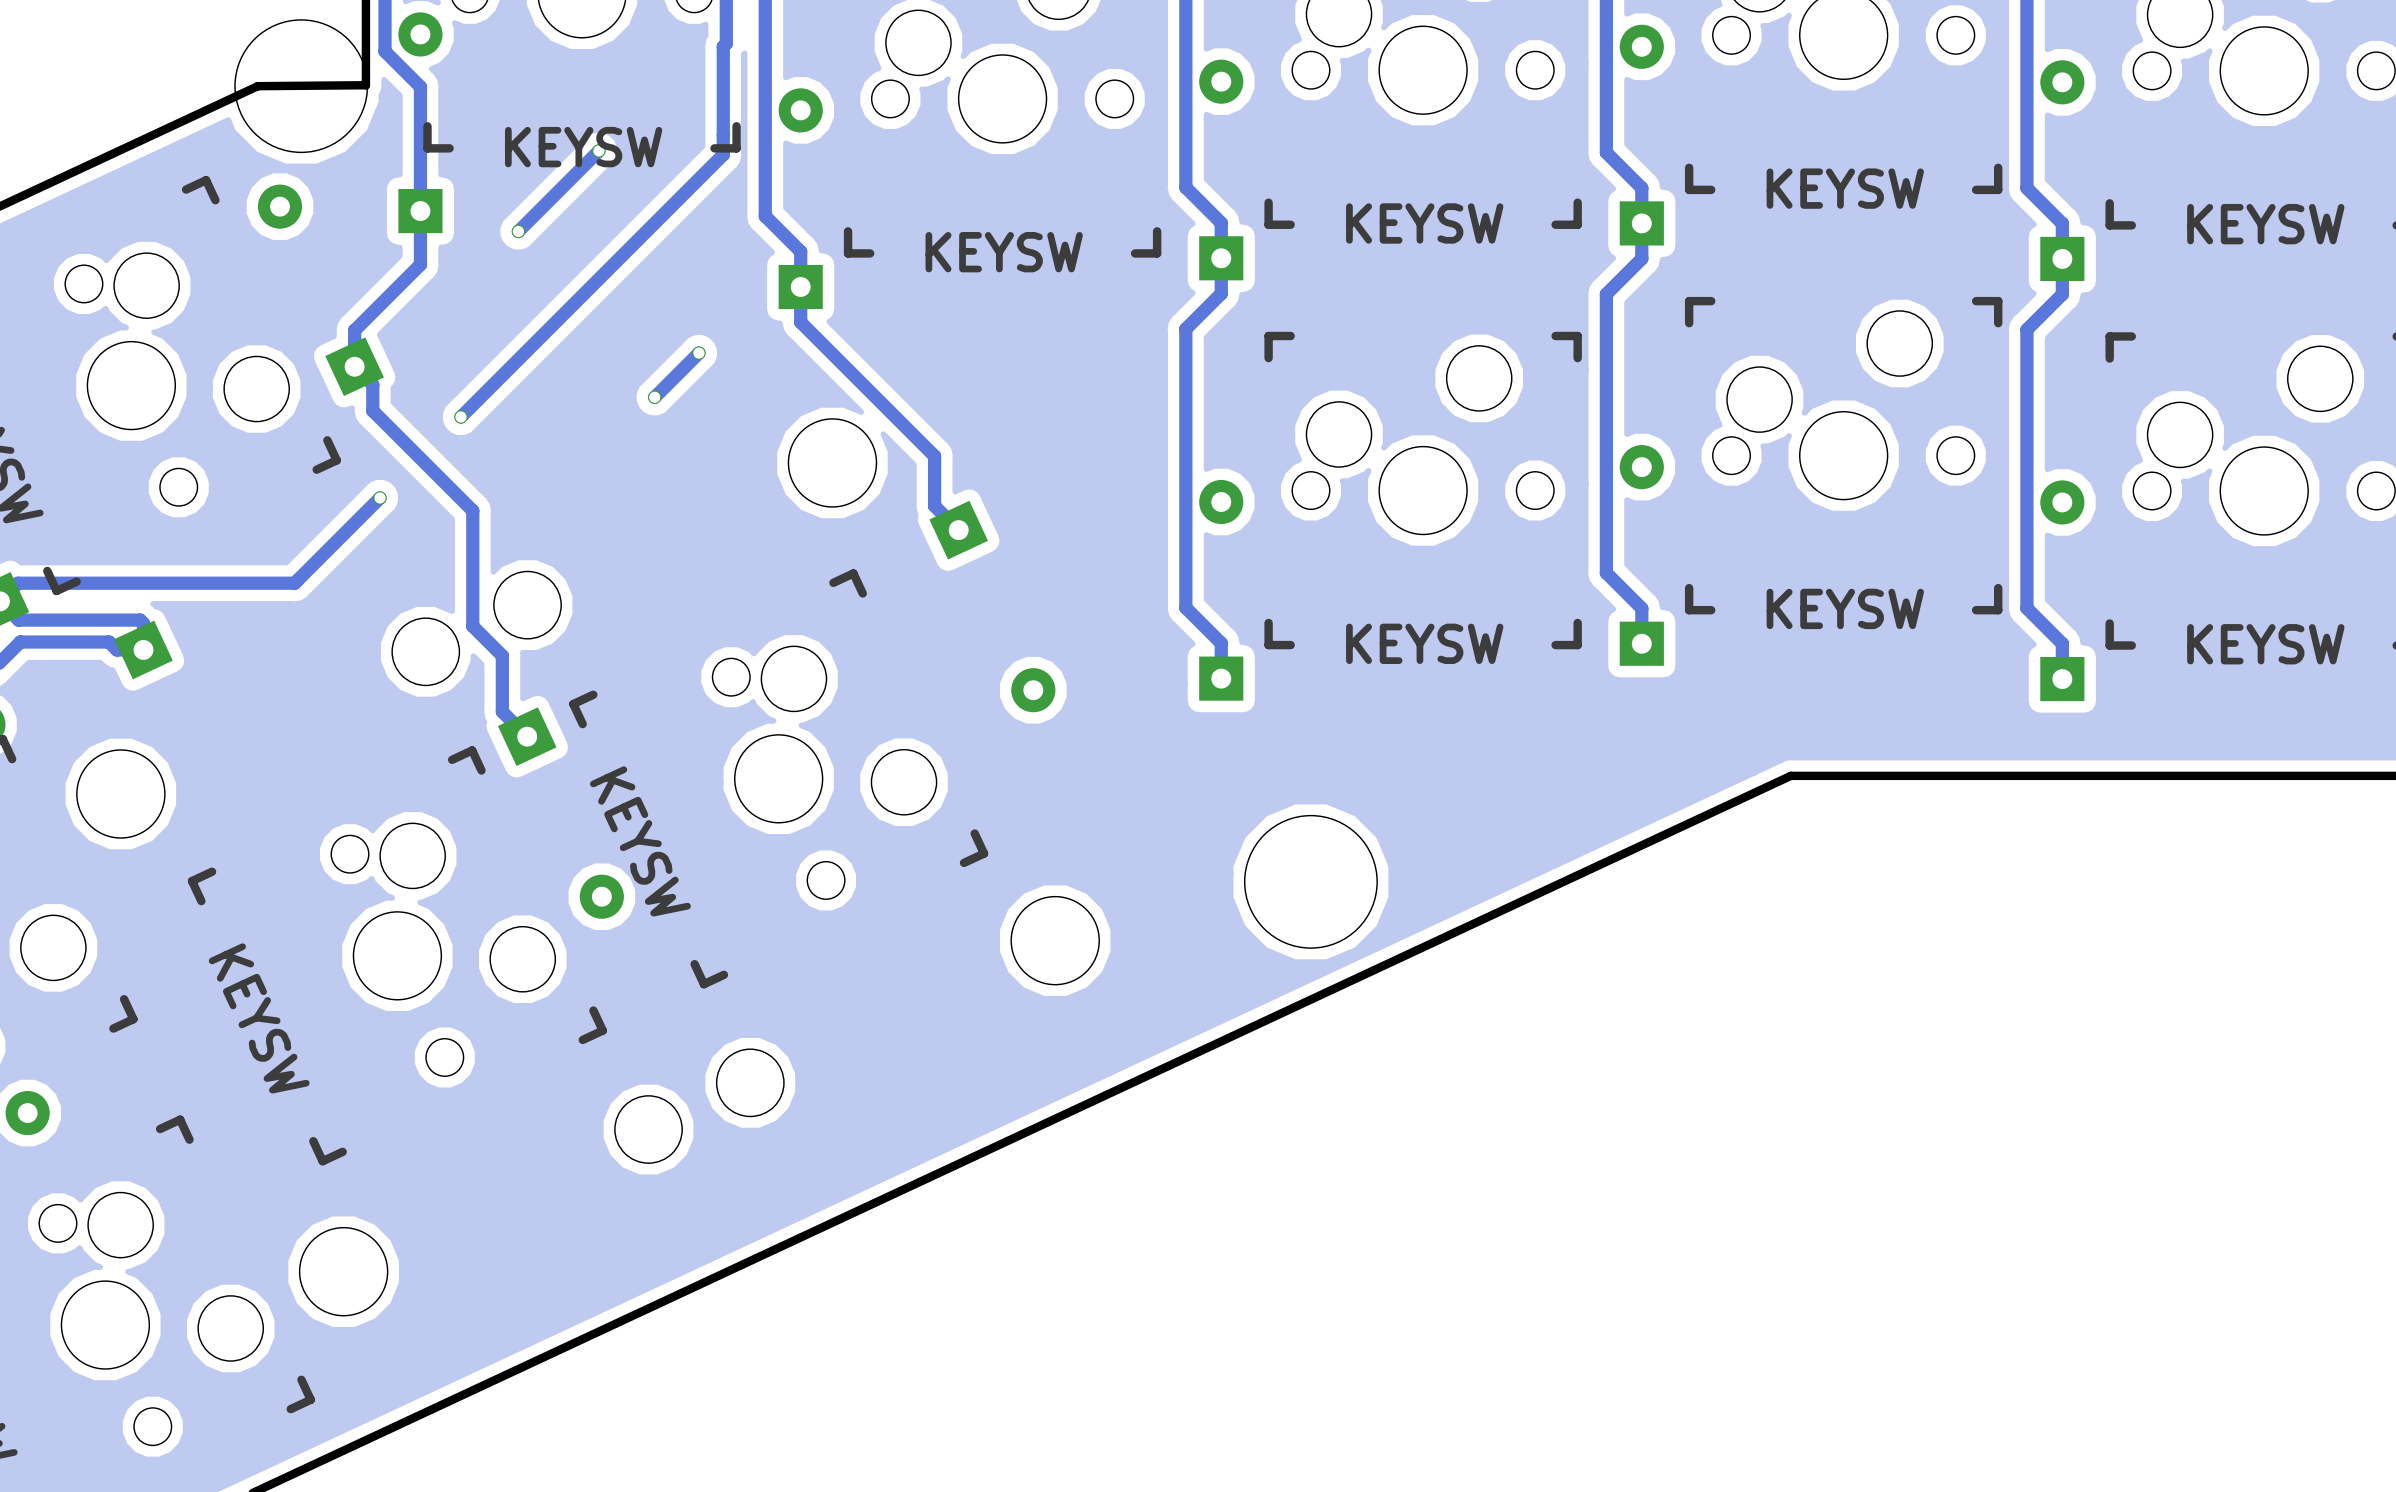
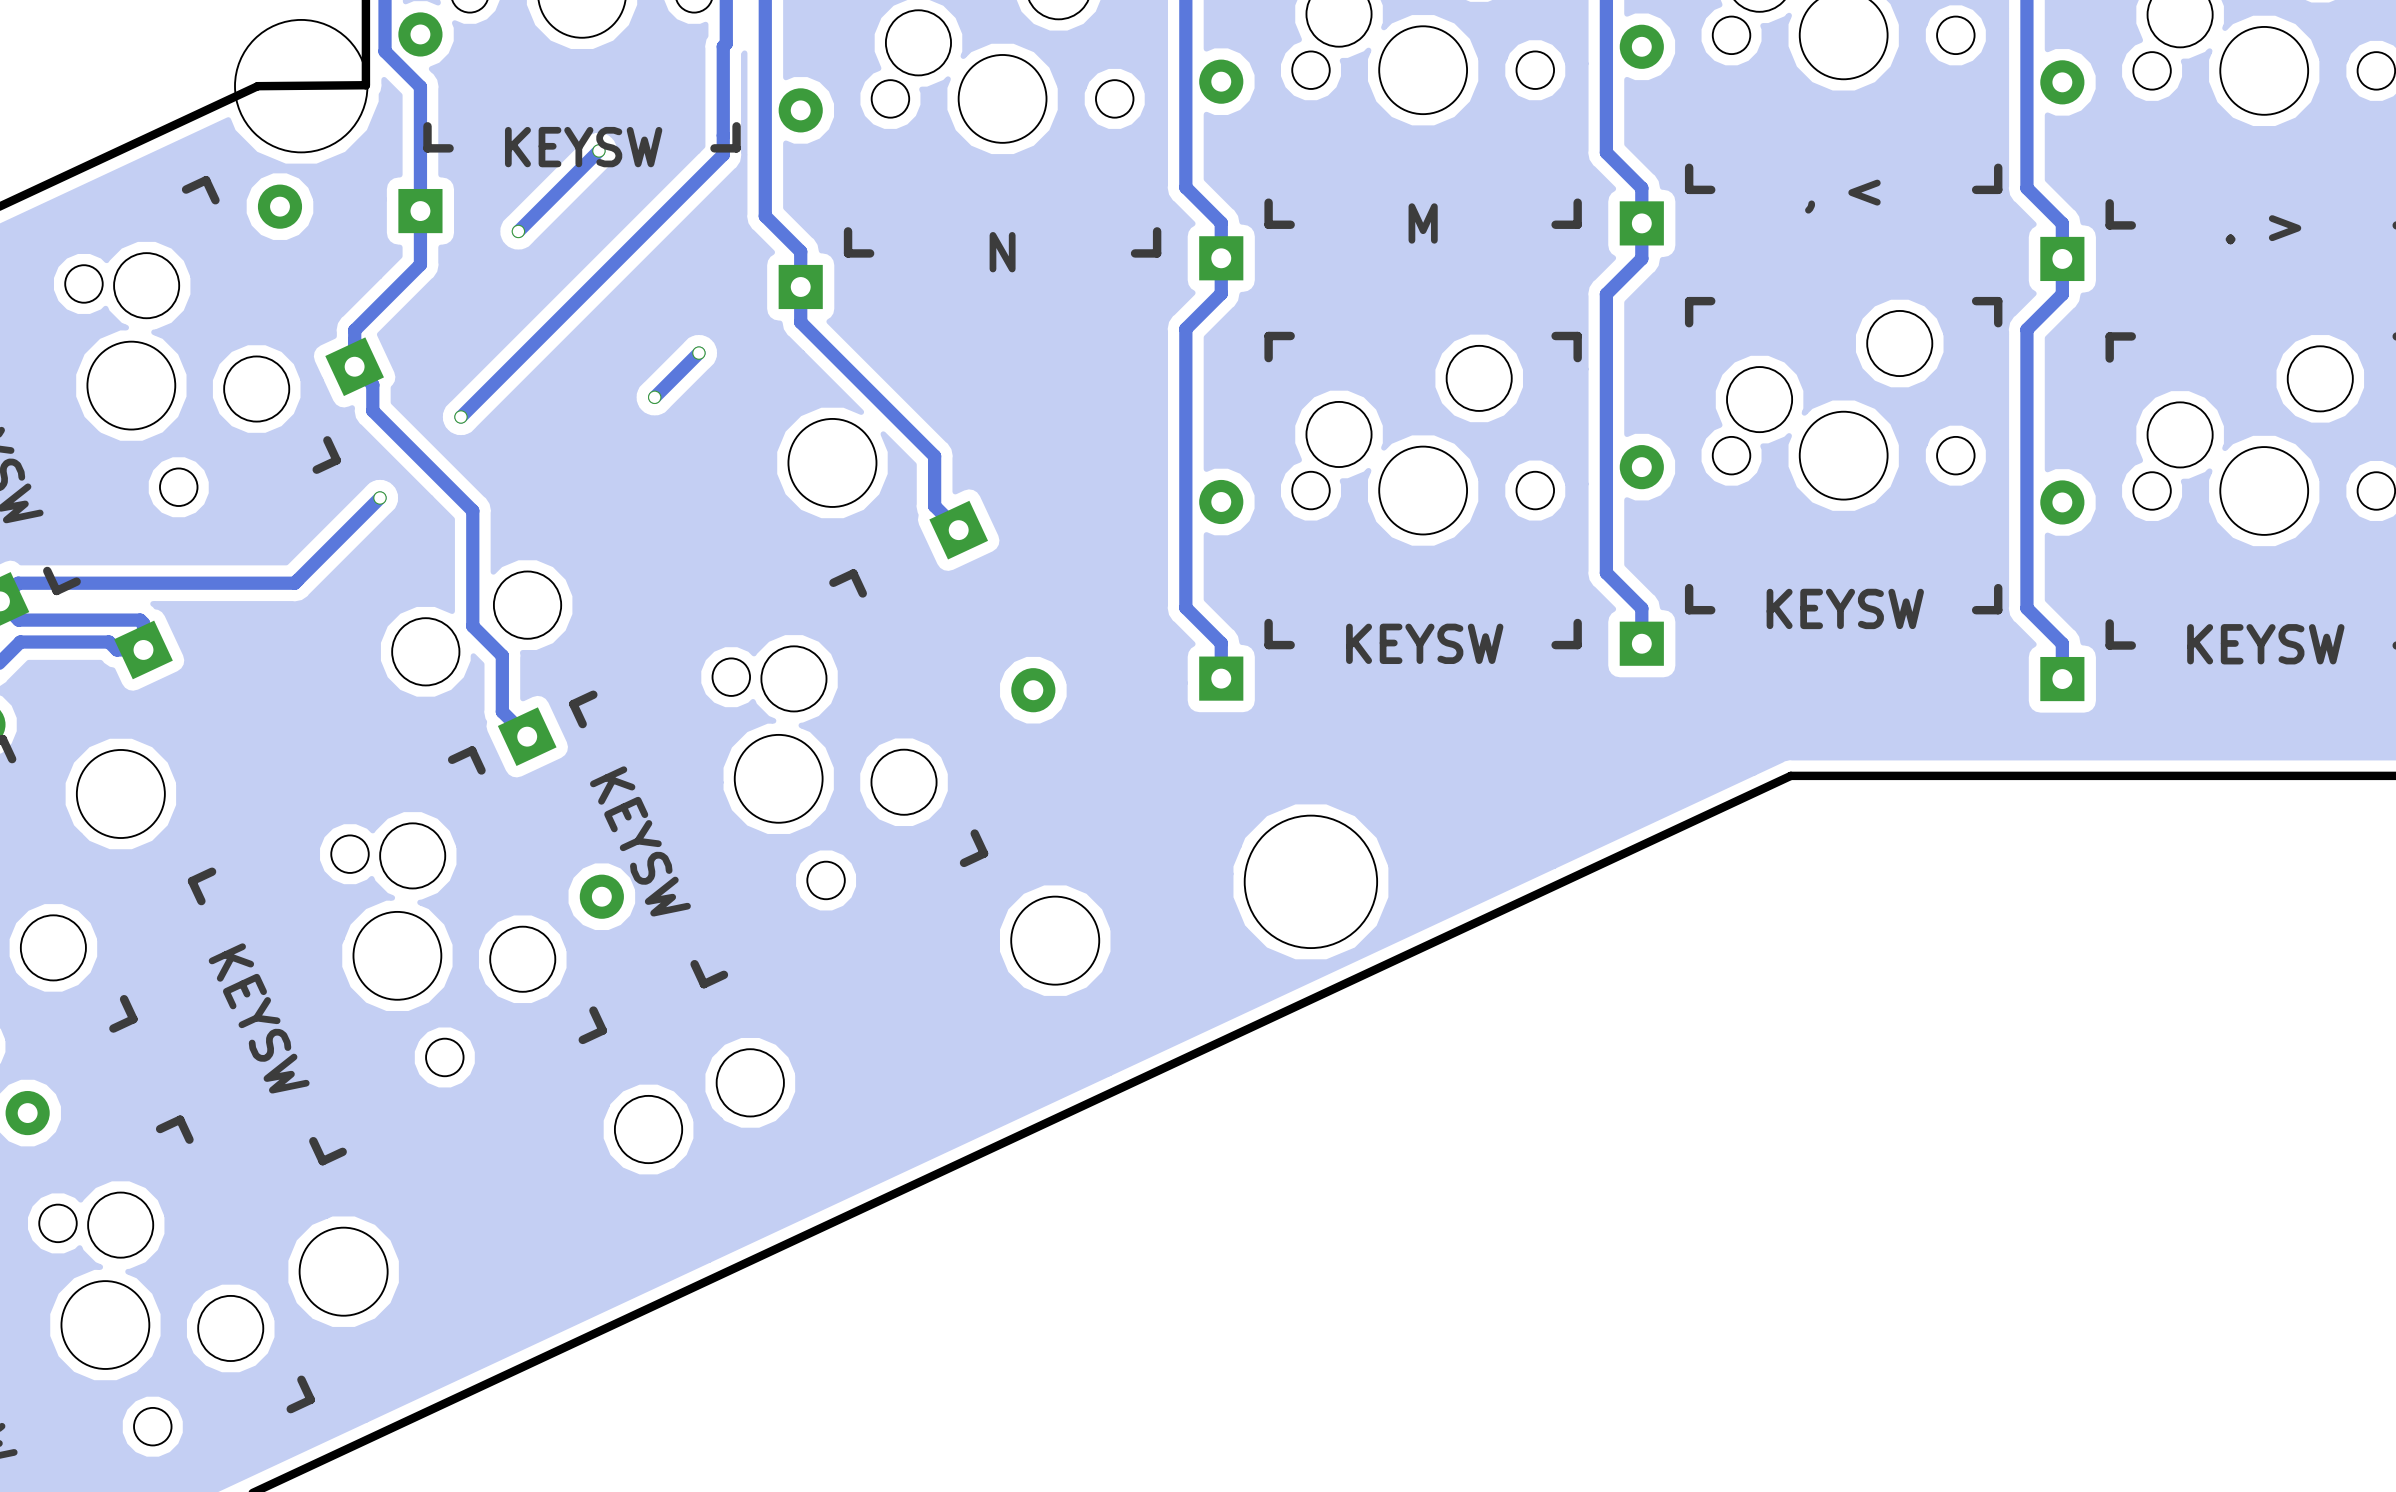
part value: KEYSW (1845, 188) -> , < (1842, 196)
part value: KEYSW (1424, 223) -> M (1423, 223)
part value: KEYSW (2265, 224) -> . > (2263, 229)
part value: KEYSW (1004, 252) -> N (1002, 252)

